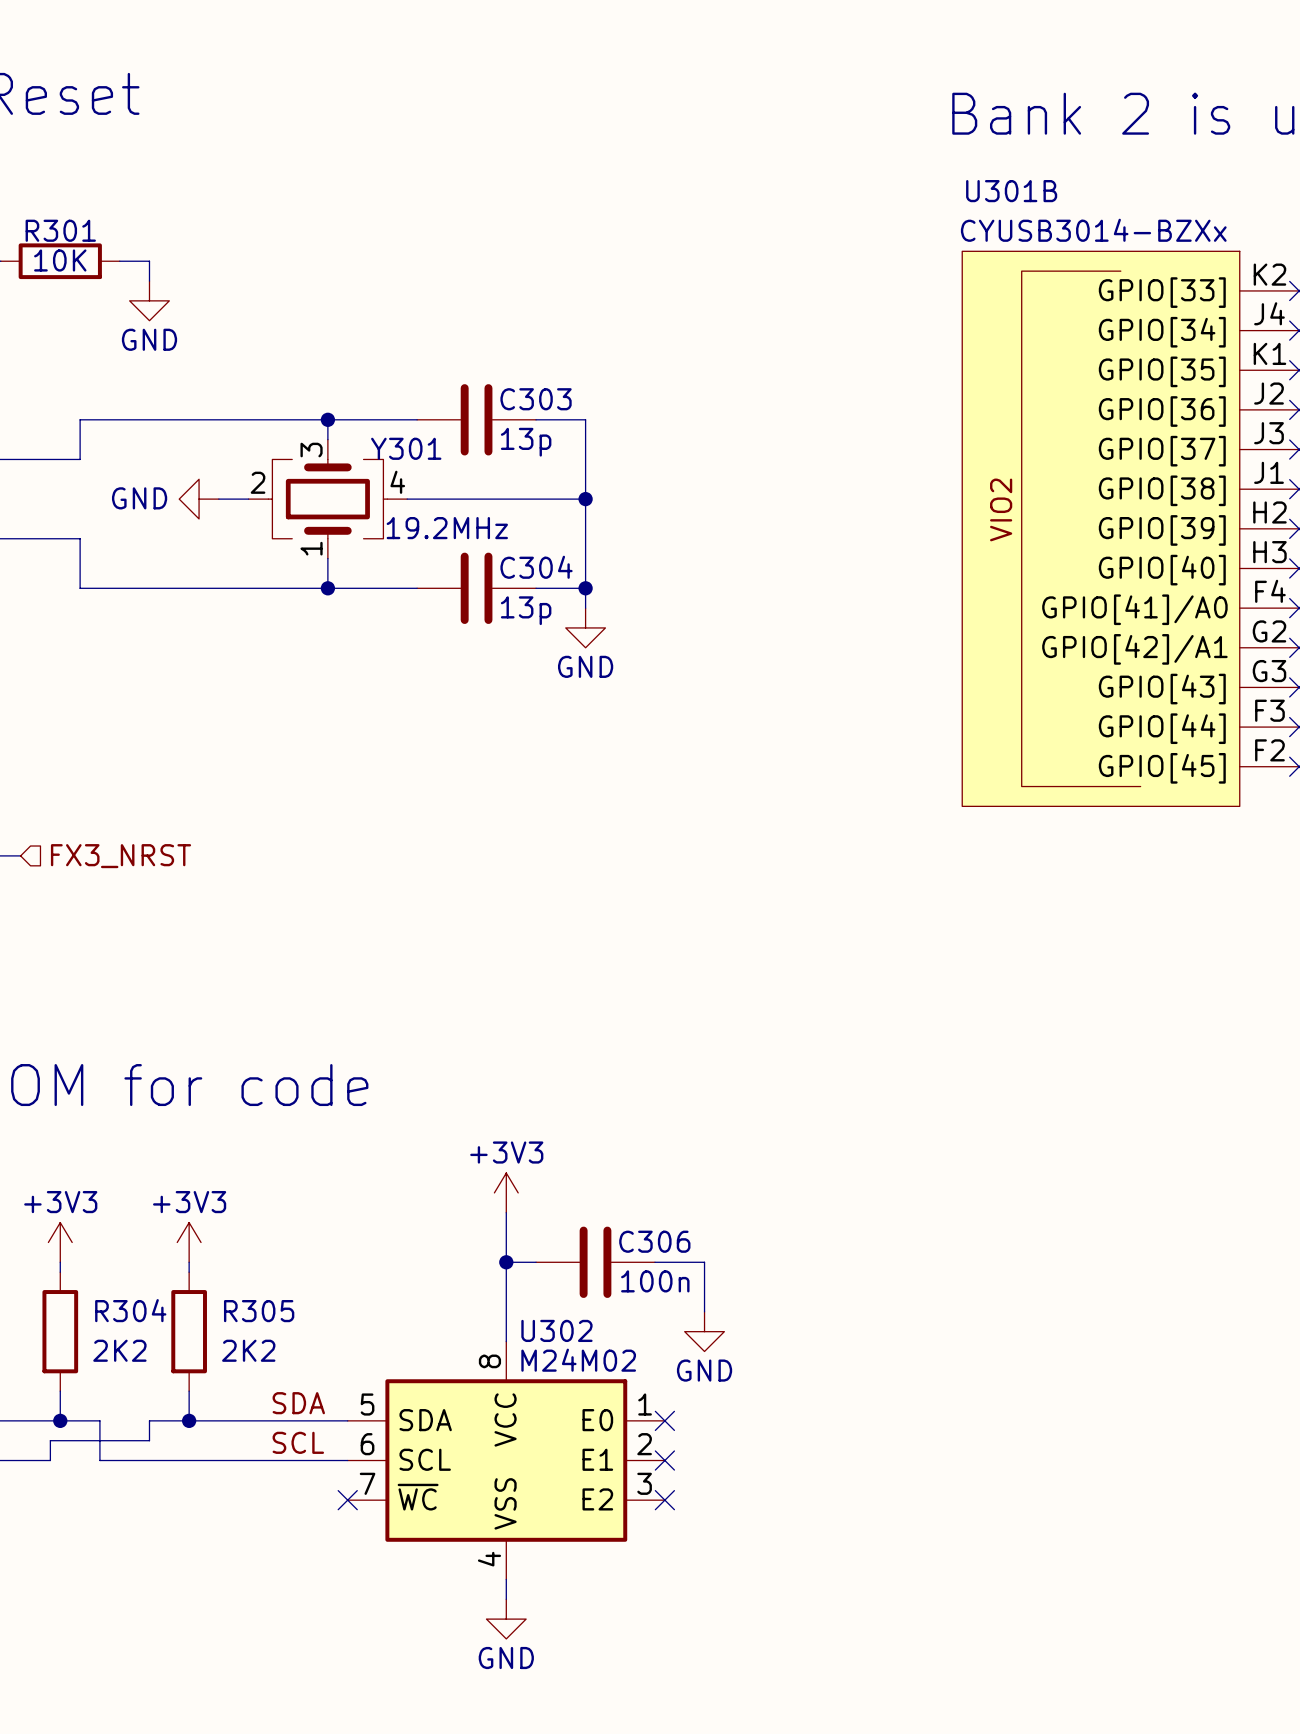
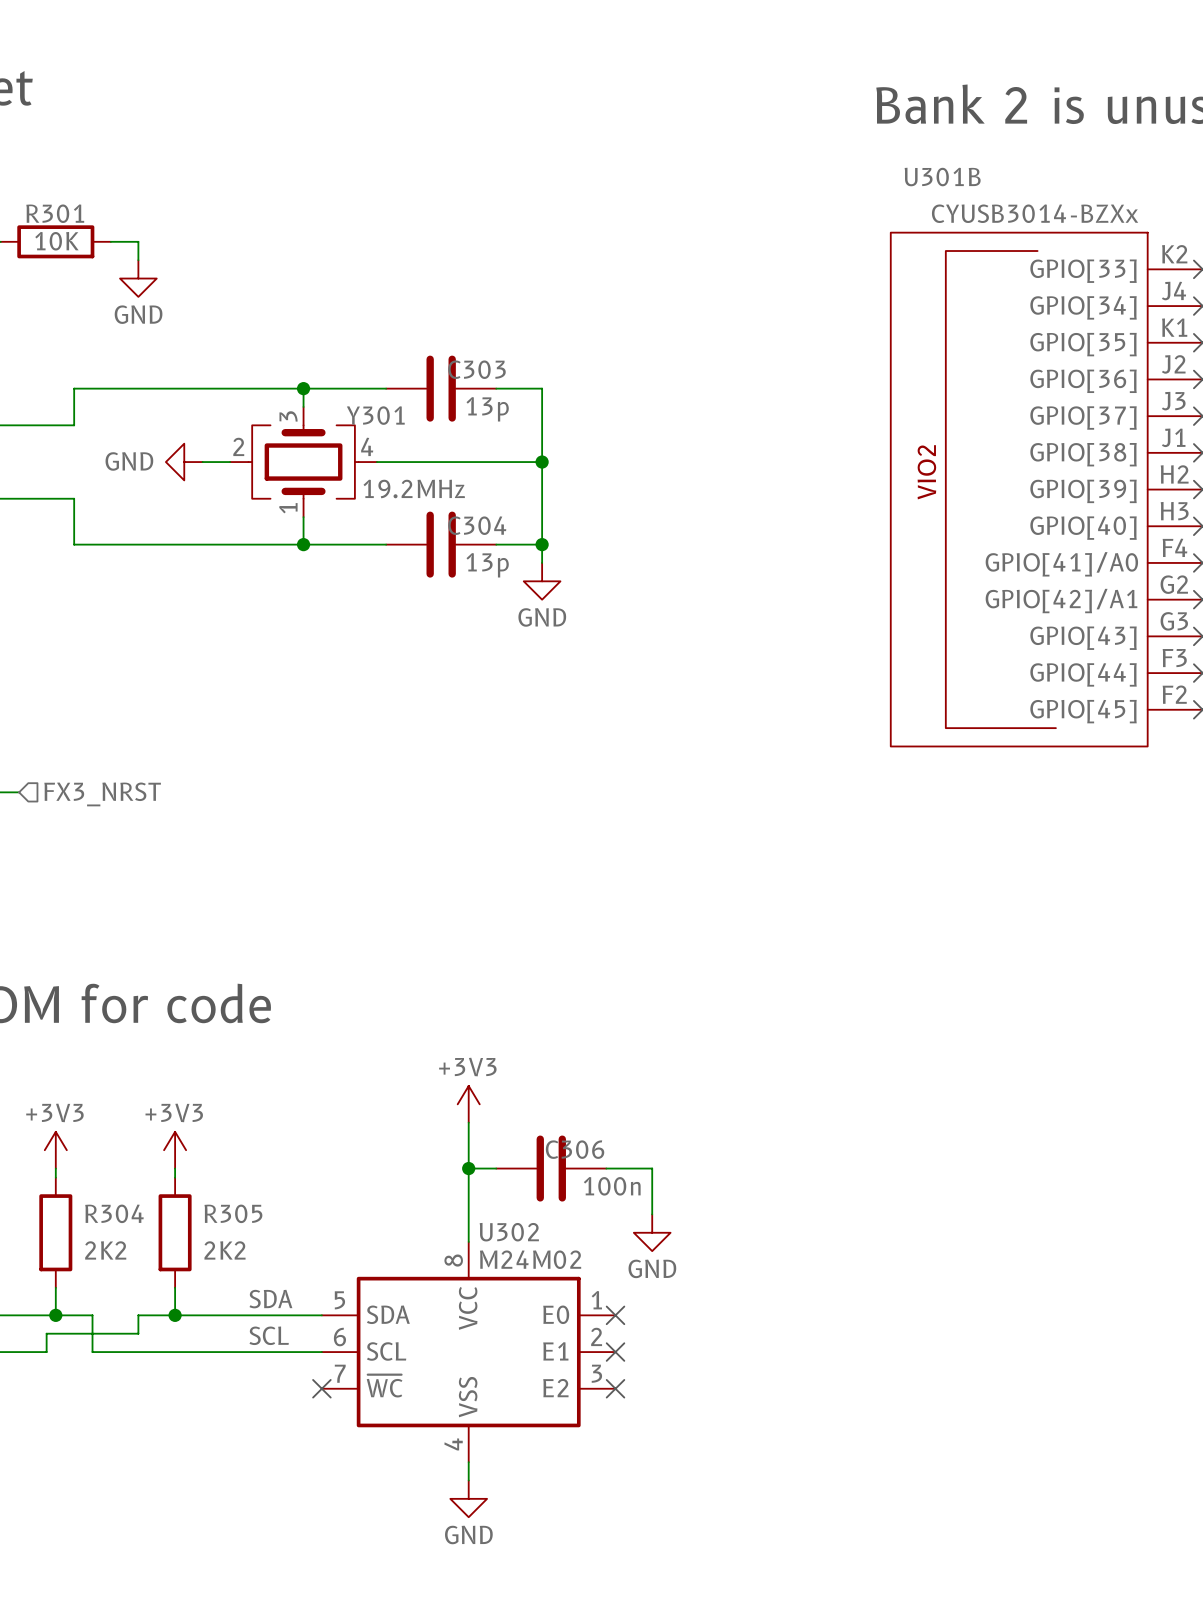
C303 name position: C303 (536, 399) -> C303 (476, 369)
C304 name position: C304 (536, 567) -> C304 (477, 525)
C306 name position: C306 (654, 1241) -> C306 (575, 1149)

